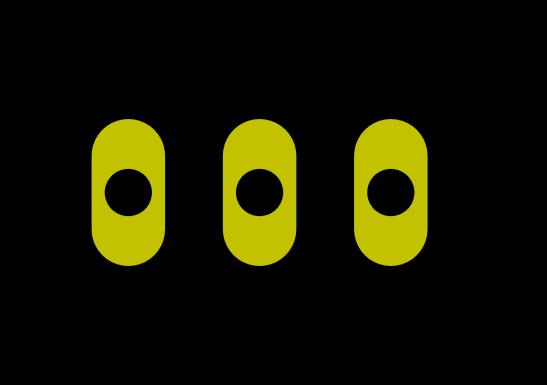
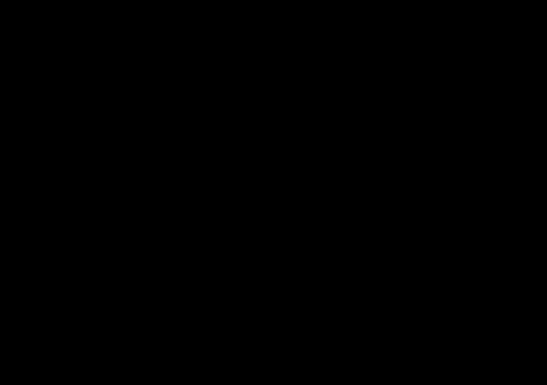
part: (259, 192) -> none

